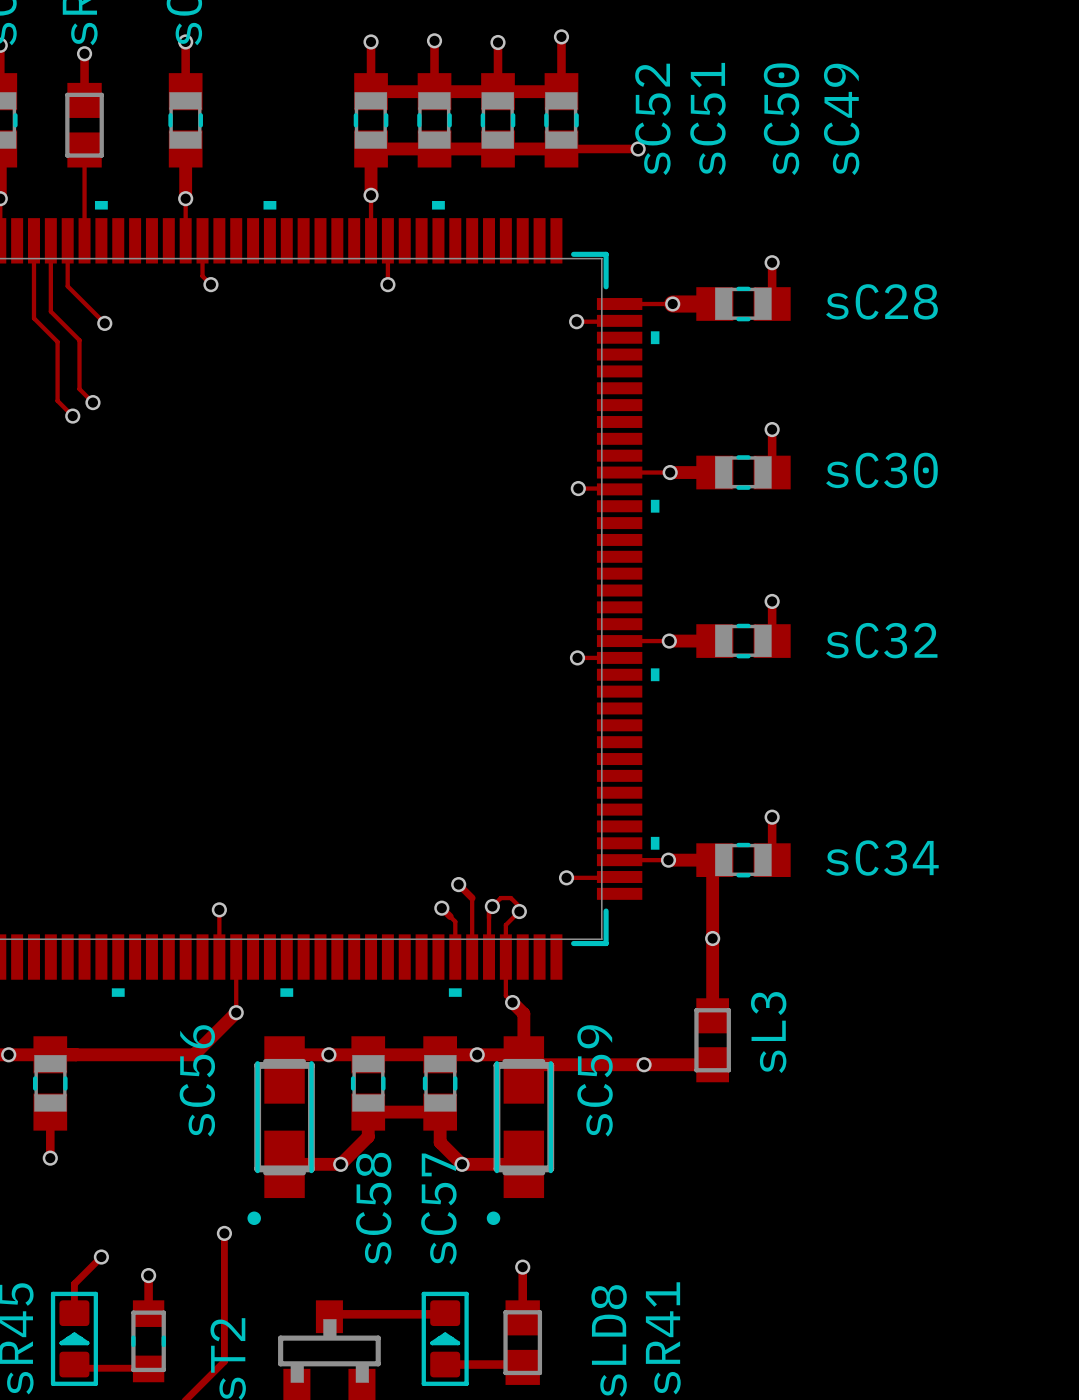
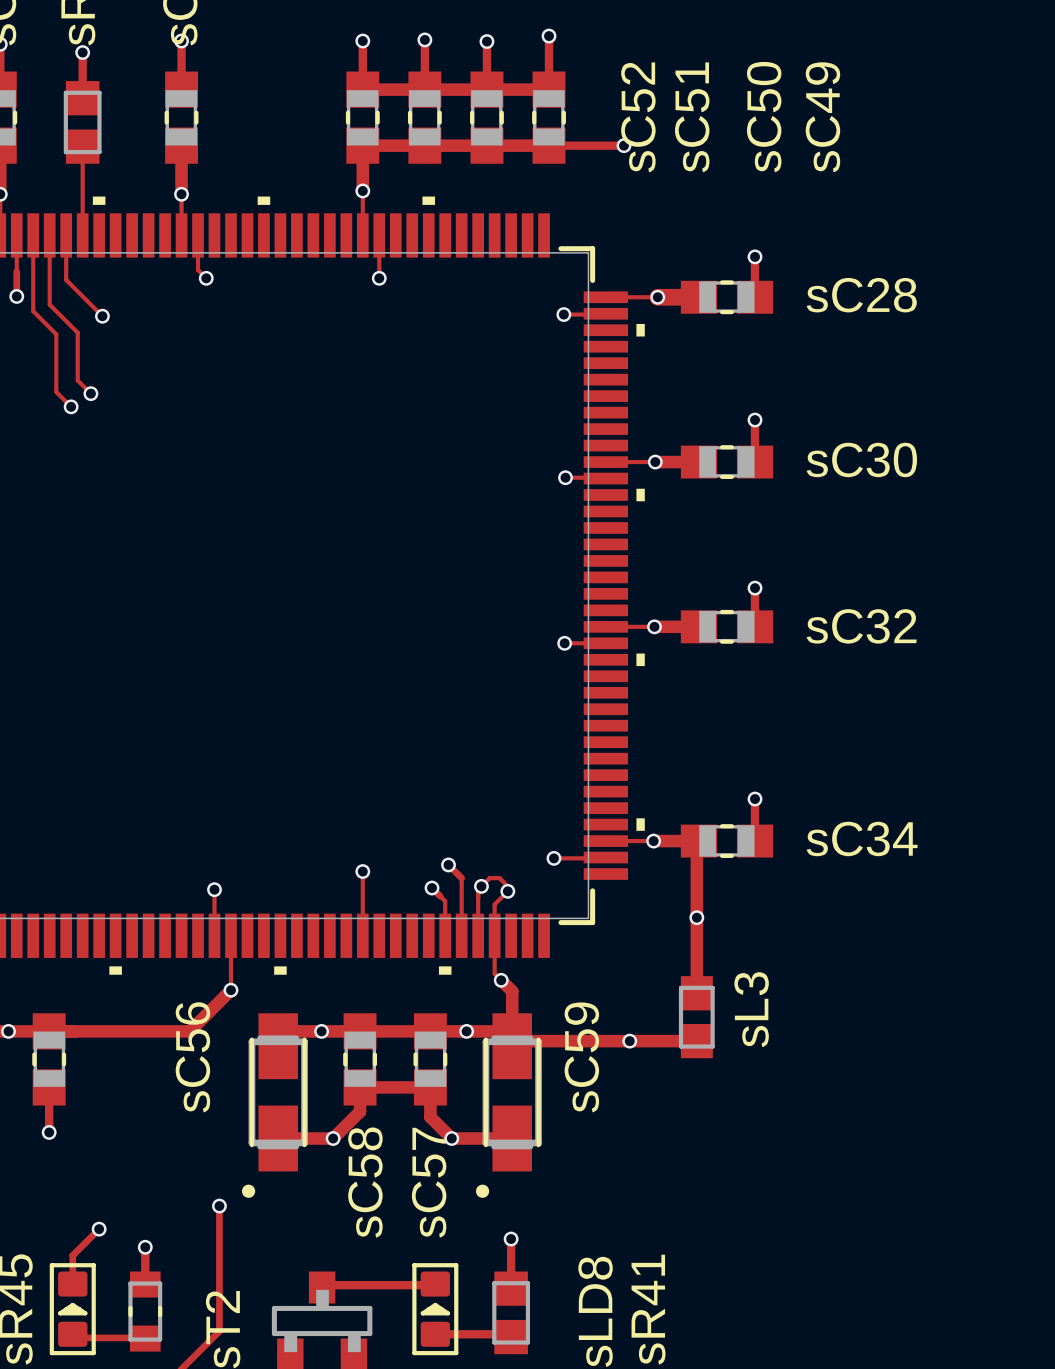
track: none -> (16, 235) (16, 296)
via: none -> (16, 296)
track: none -> (362, 871) (362, 935)
via: none -> (362, 871)

